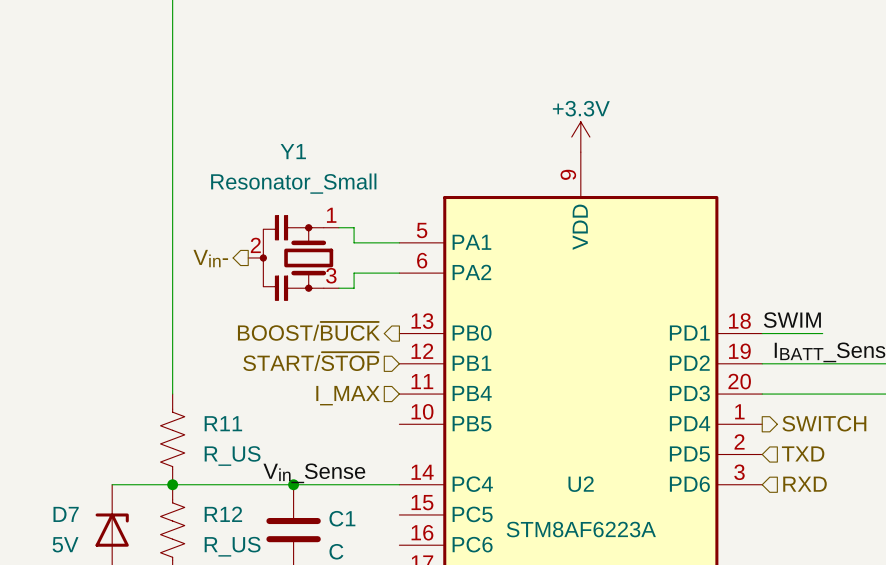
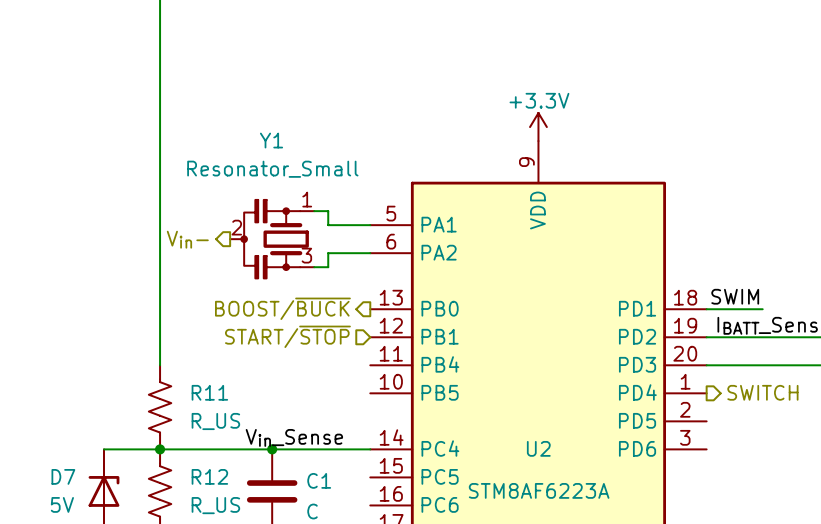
hierarchical label: I_MAX (348, 395) -> none
hierarchical label: TXD (803, 453) -> none
hierarchical label: RXD (805, 484) -> none

